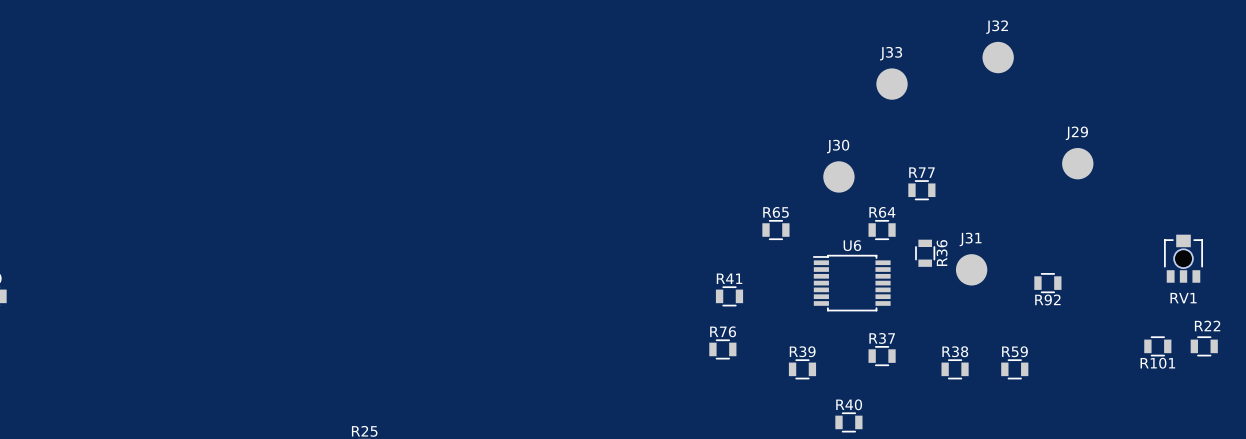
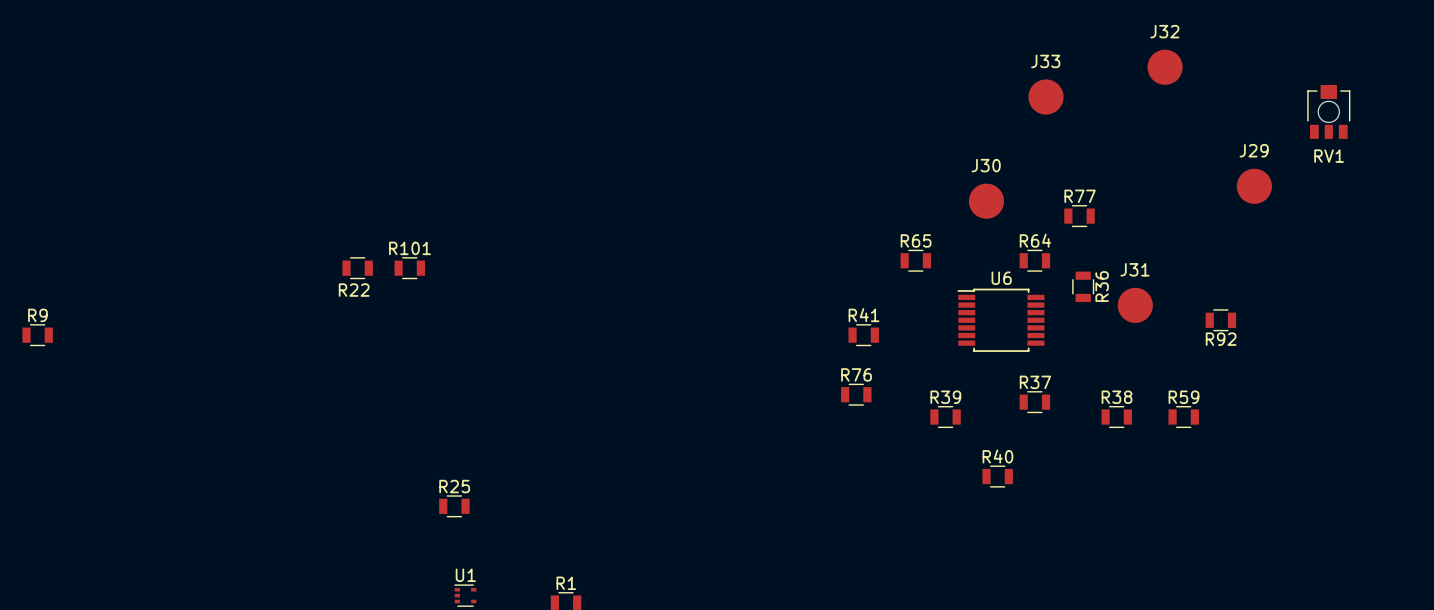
RV1 position: (1183, 258) -> (1328, 111)
R22 name position: R22 (1207, 325) -> R22 (354, 290)
R101 position: (1157, 346) -> (409, 268)
R22 position: (1204, 346) -> (357, 268)
R101 name position: R101 (1157, 363) -> R101 (410, 248)

